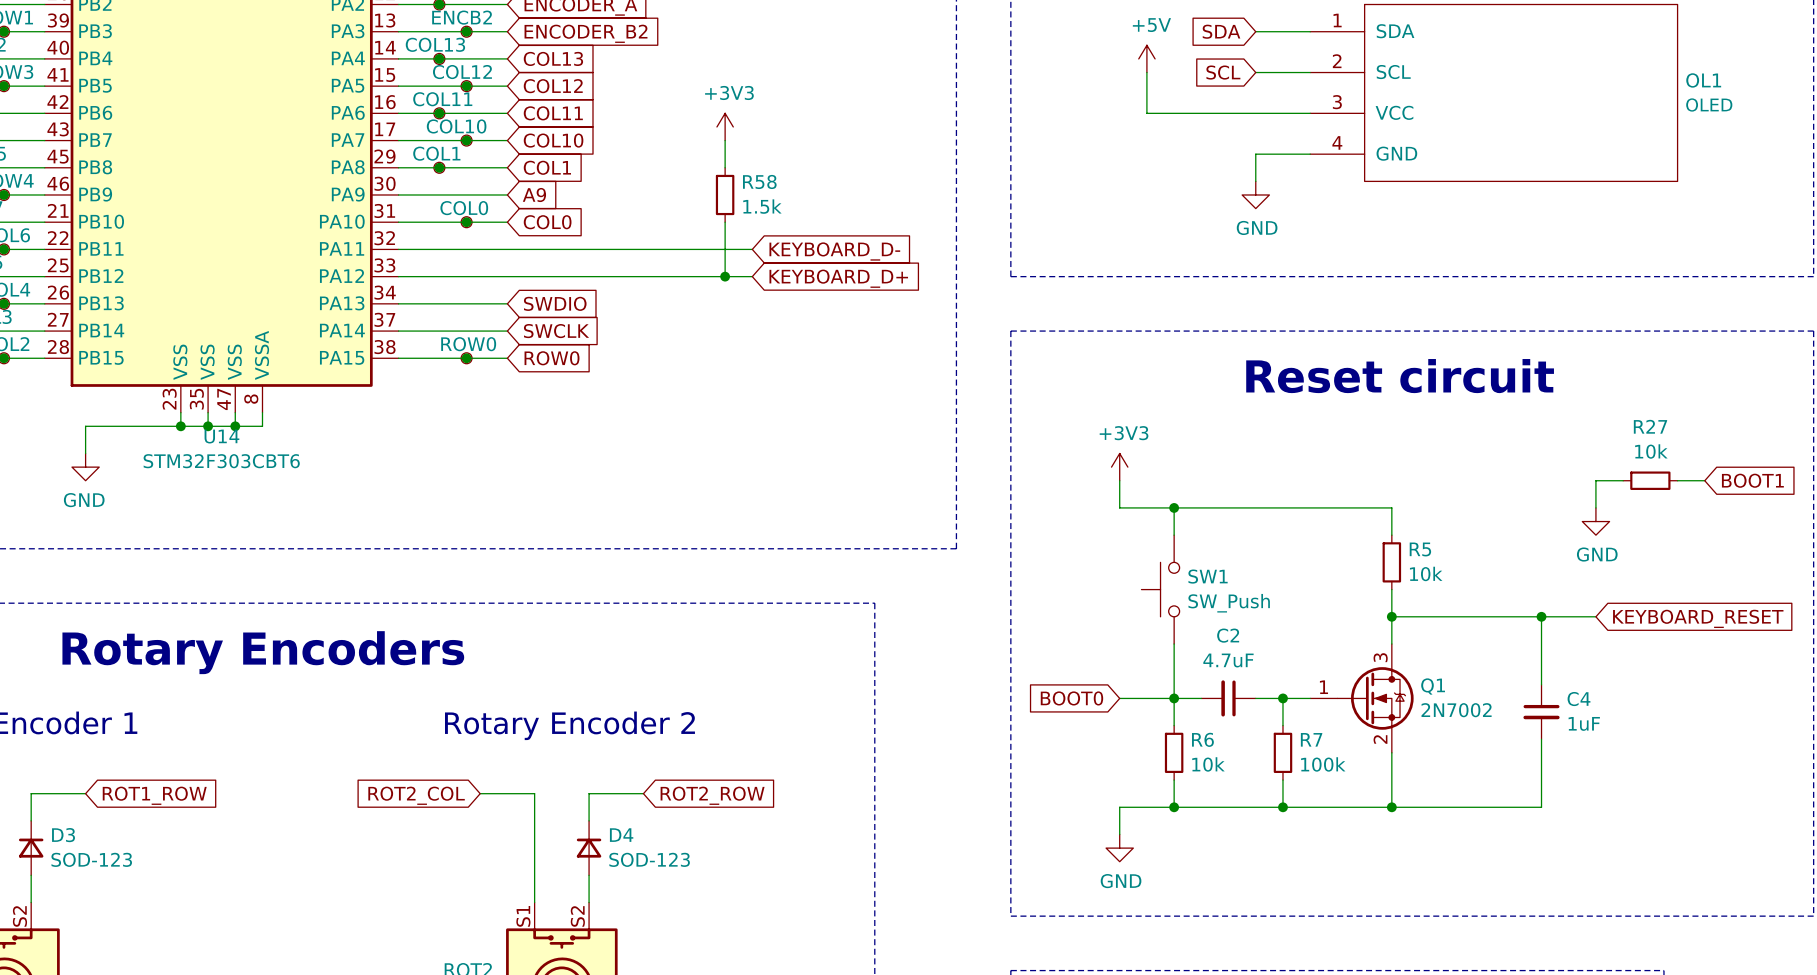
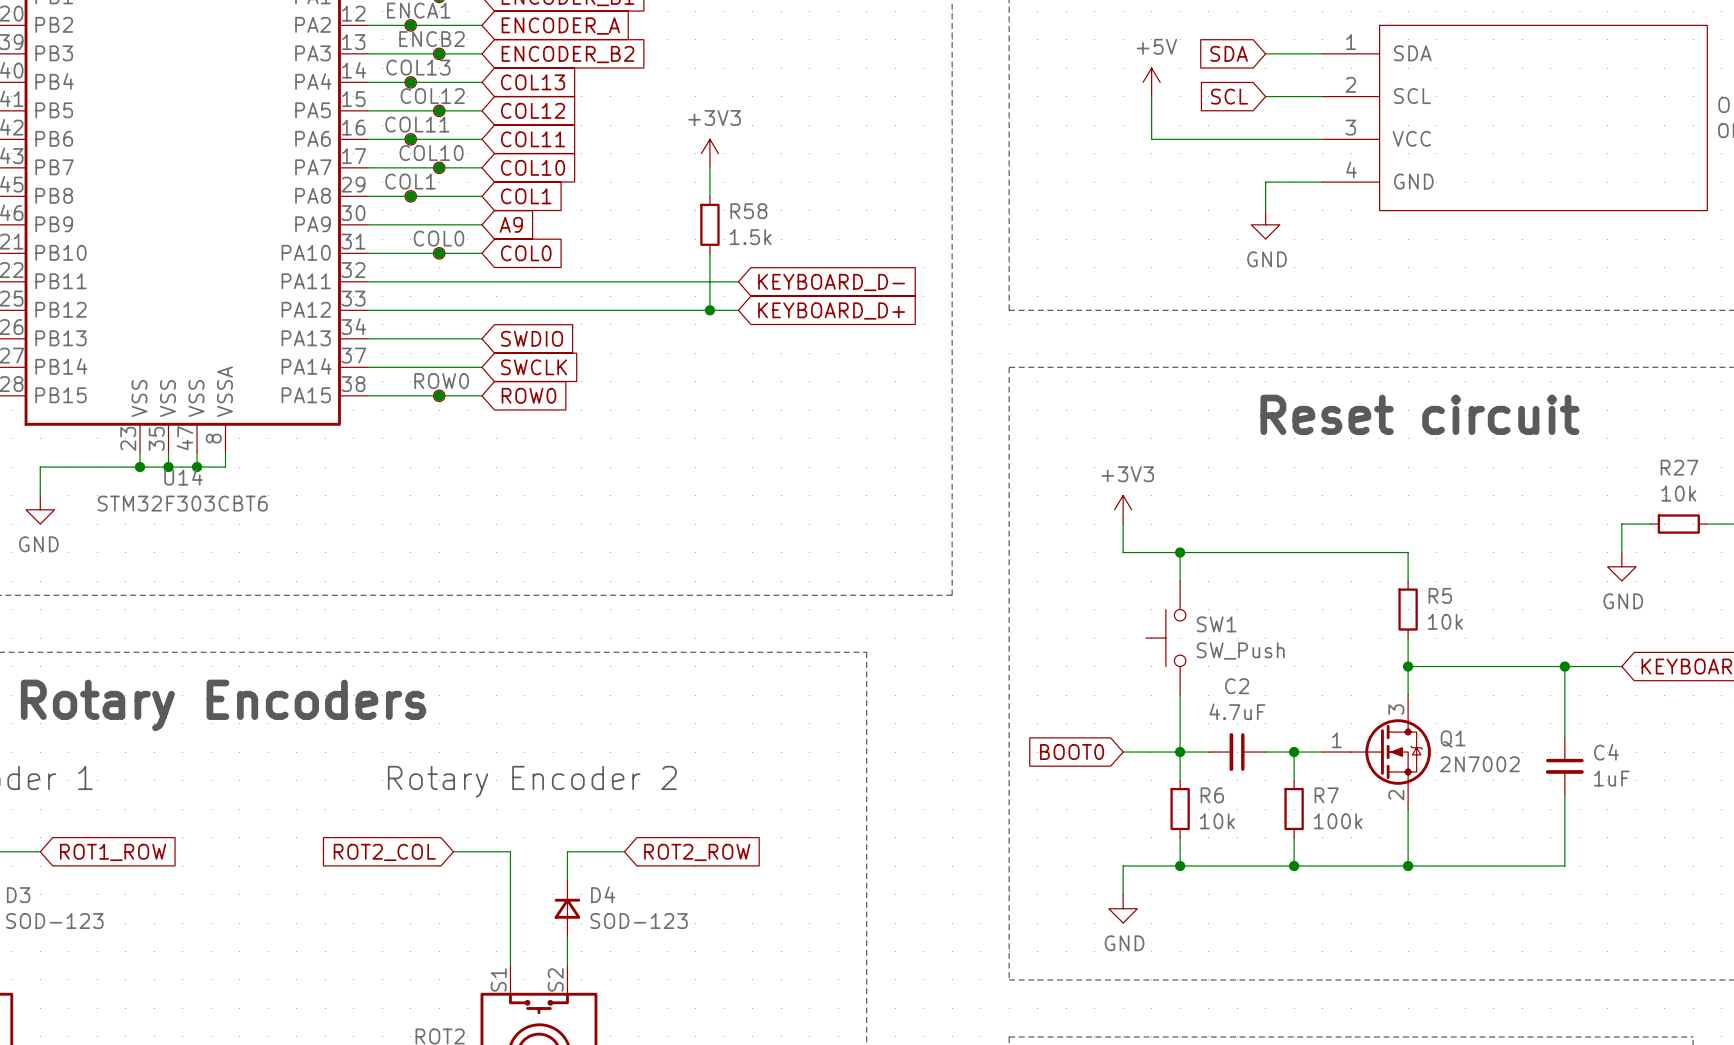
COL13 name position: COL13 (435, 44) -> COL13 (418, 67)

